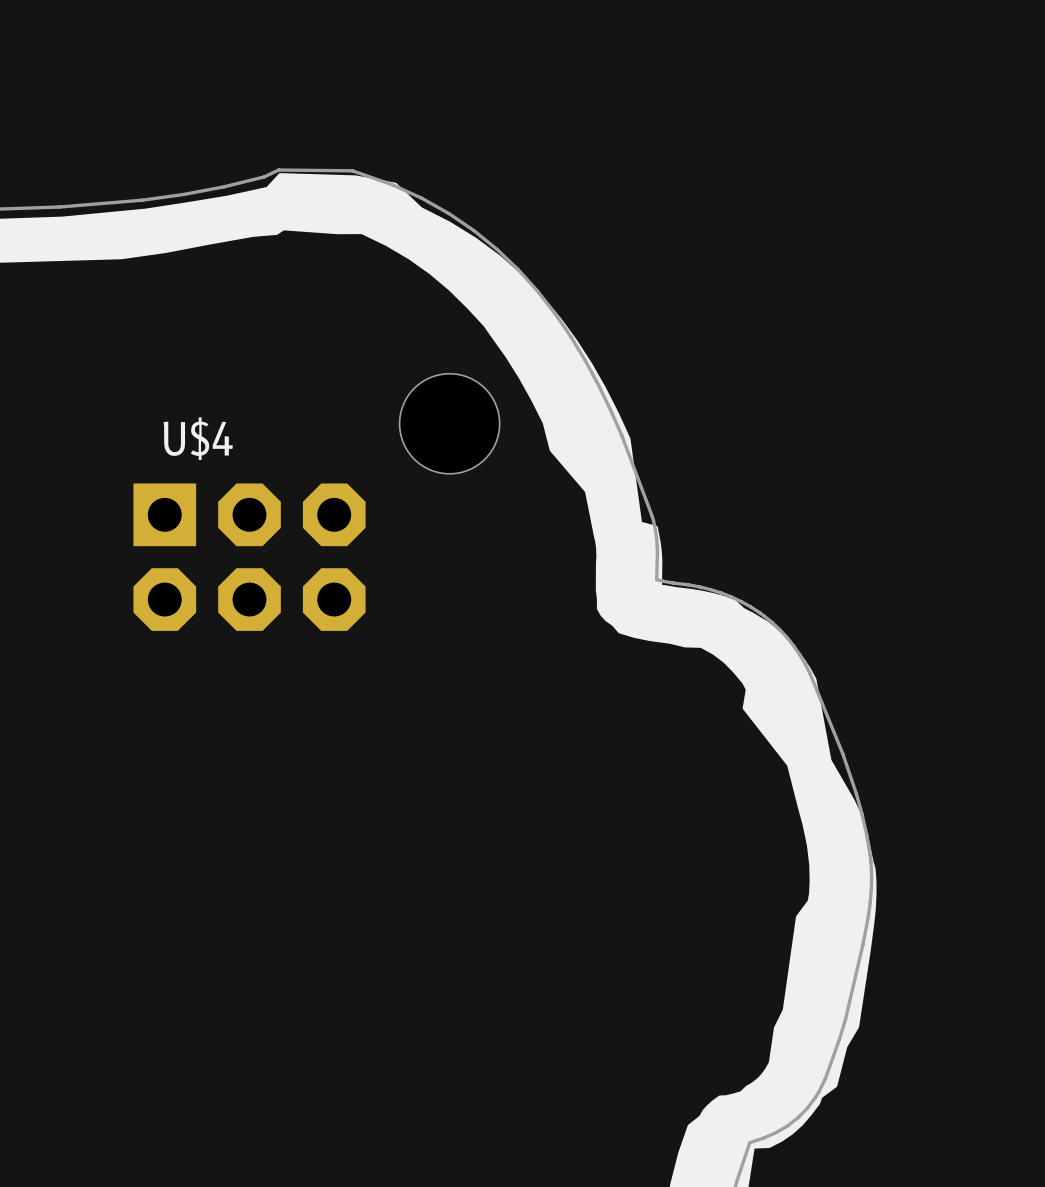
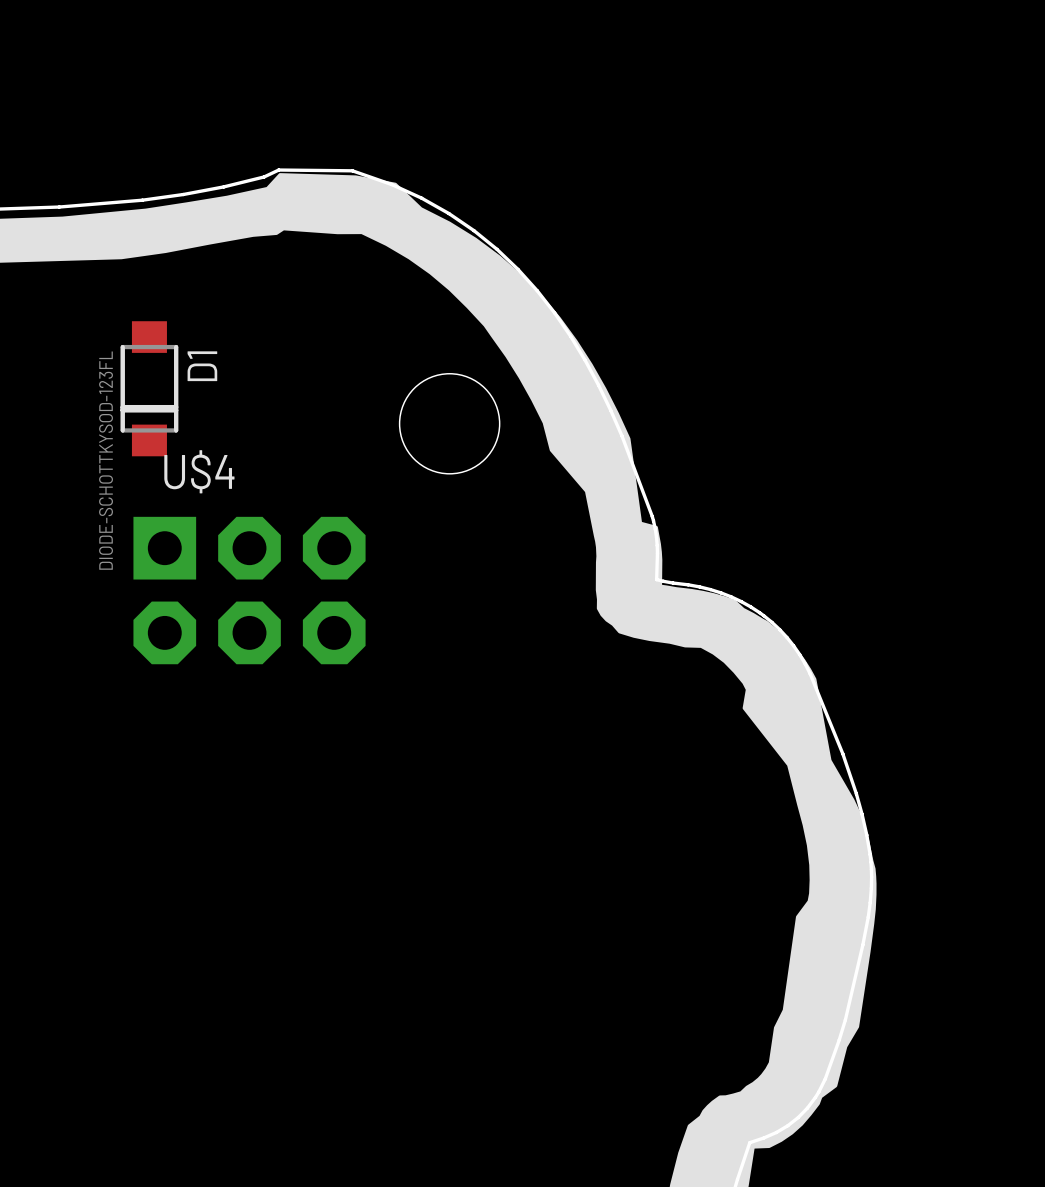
D1: none -> DIODE-SCHOTTKYSOD-123FL (149, 388)
U$4 position: (249, 557) -> (249, 590)

